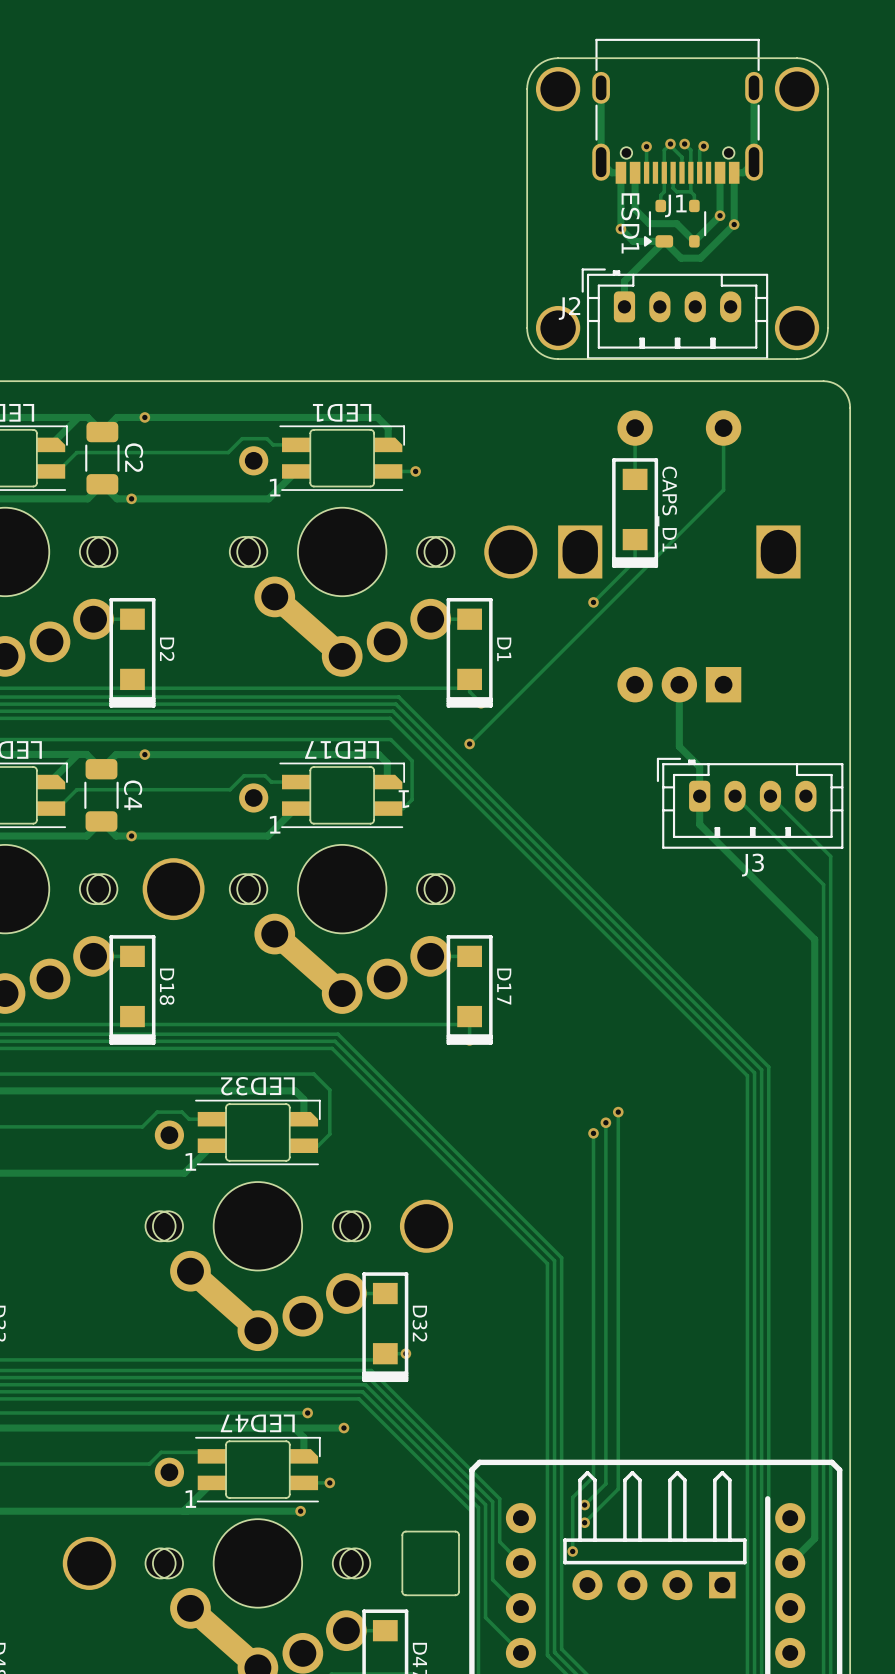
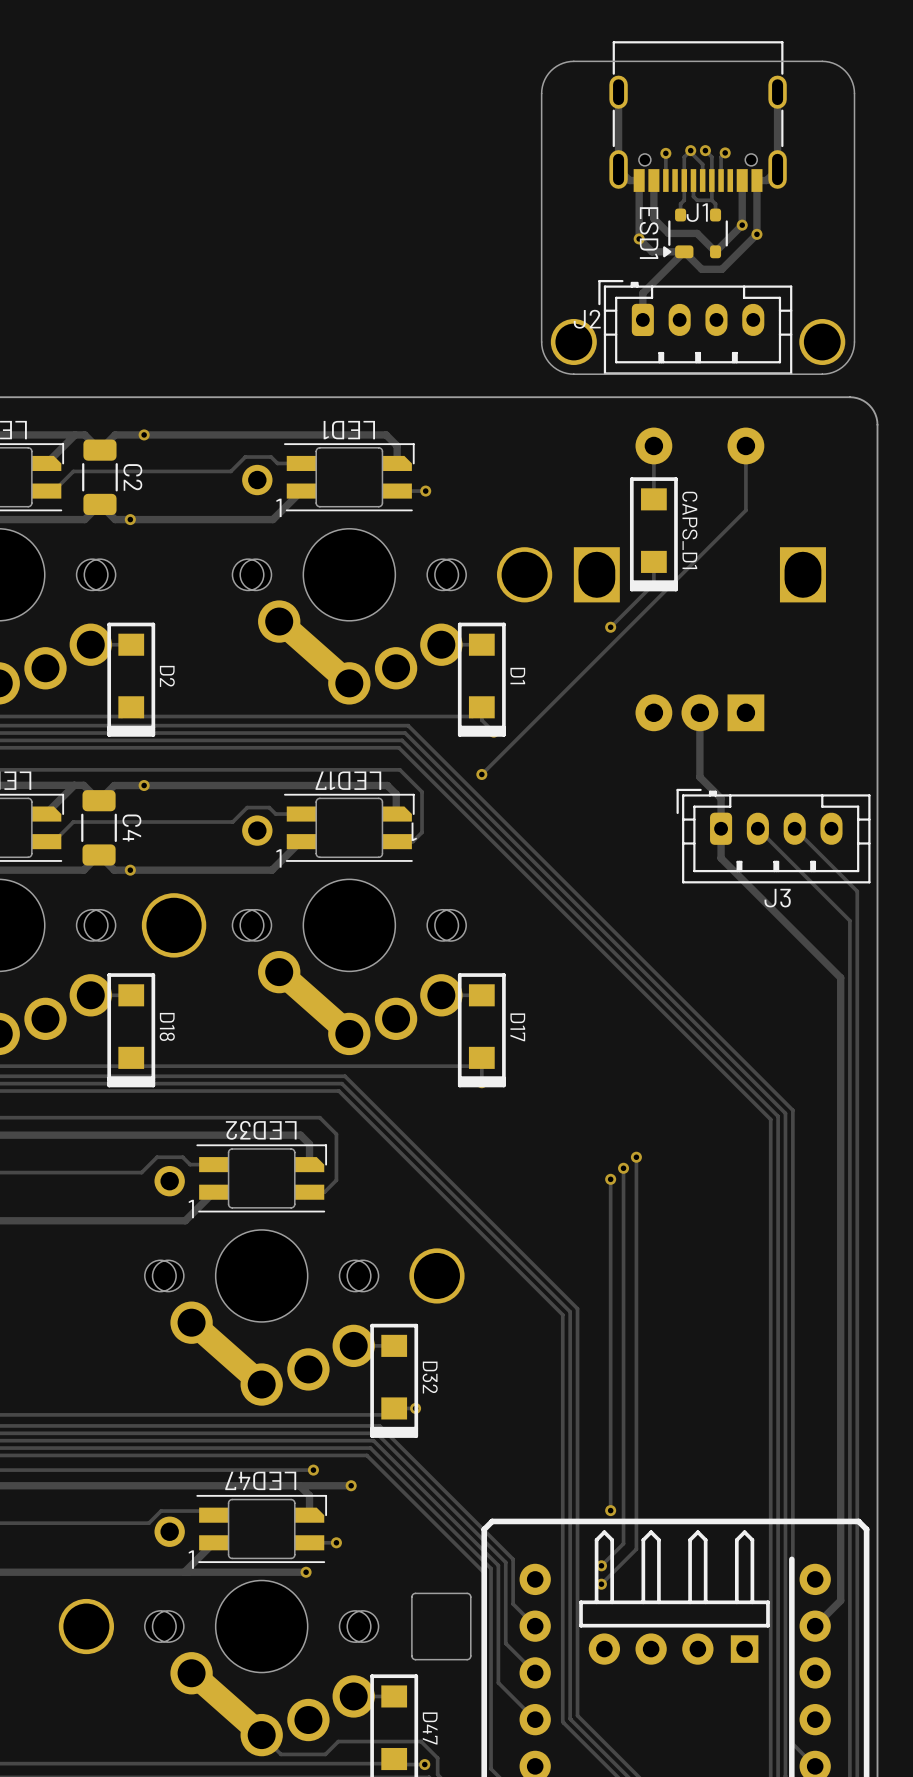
part: (558, 89) -> none
part: (797, 89) -> none
track: (593, 1451) (593, 1476) (572, 1497) (572, 1551) -> none
via position: (572, 1551) -> (610, 1510)

